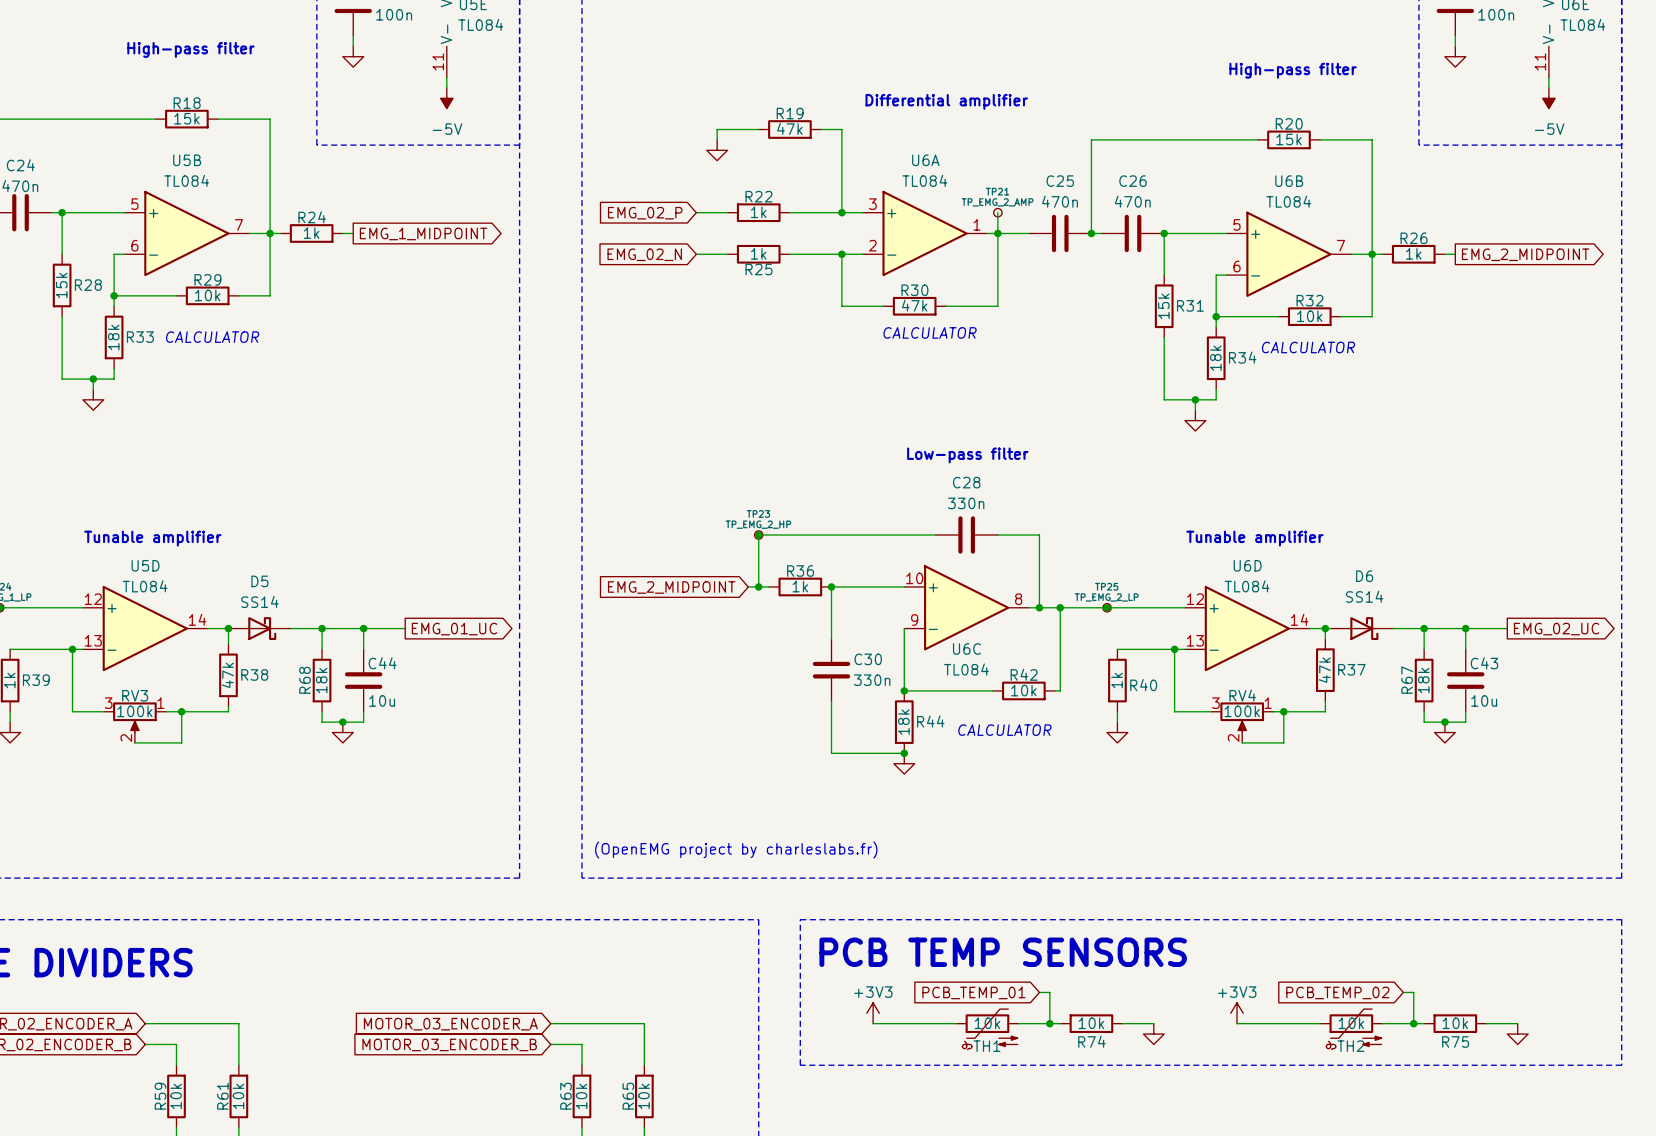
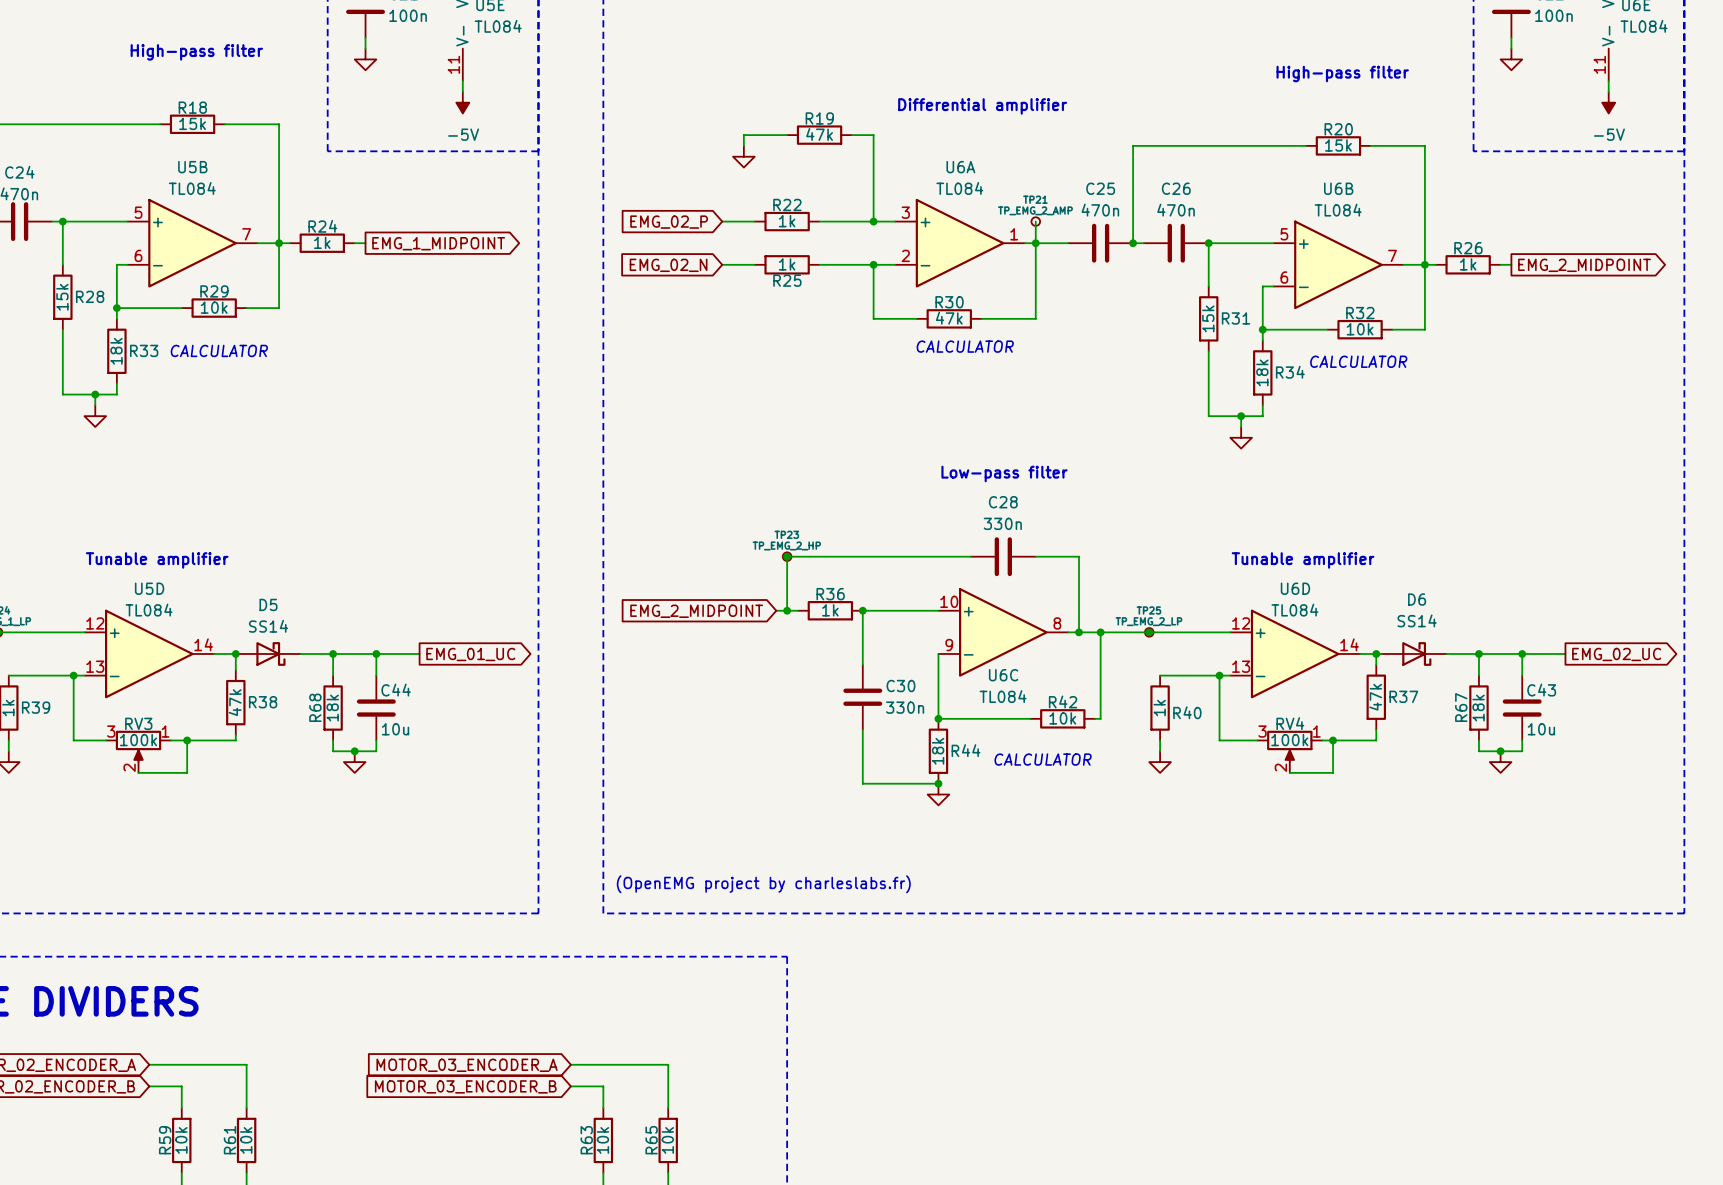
line: (800, 919) (1621, 919) (1621, 1065) (800, 1065) (800, 919) -> none
text: PCB TEMP SENSORS (1003, 952) -> none
global label: PCB_TEMP_01 (973, 992) -> none
wire: (1039, 992) (1049, 992) (1049, 1023) -> none
global label: PCB_TEMP_02 (1337, 992) -> none
wire: (1403, 992) (1413, 992) (1413, 1023) -> none
power symbol: +3V3 (873, 1013) -> none
power symbol: +3V3 (1236, 1013) -> none
wire: (873, 1023) (956, 1023) -> none
wire: (1018, 1023) (1060, 1023) -> none
junction: (1049, 1023) -> none
R74: 10k (1091, 1023) -> none
wire: (1122, 1023) (1153, 1023) -> none
wire: (1236, 1023) (1320, 1023) -> none
wire: (1382, 1023) (1424, 1023) -> none
junction: (1413, 1023) -> none
R75: 10k (1455, 1023) -> none
wire: (1486, 1023) (1517, 1023) -> none
TH1: 10k (987, 1029) -> none
TH2: 10k (1351, 1029) -> none
power symbol: (1153, 1034) -> none
power symbol: (1517, 1034) -> none

